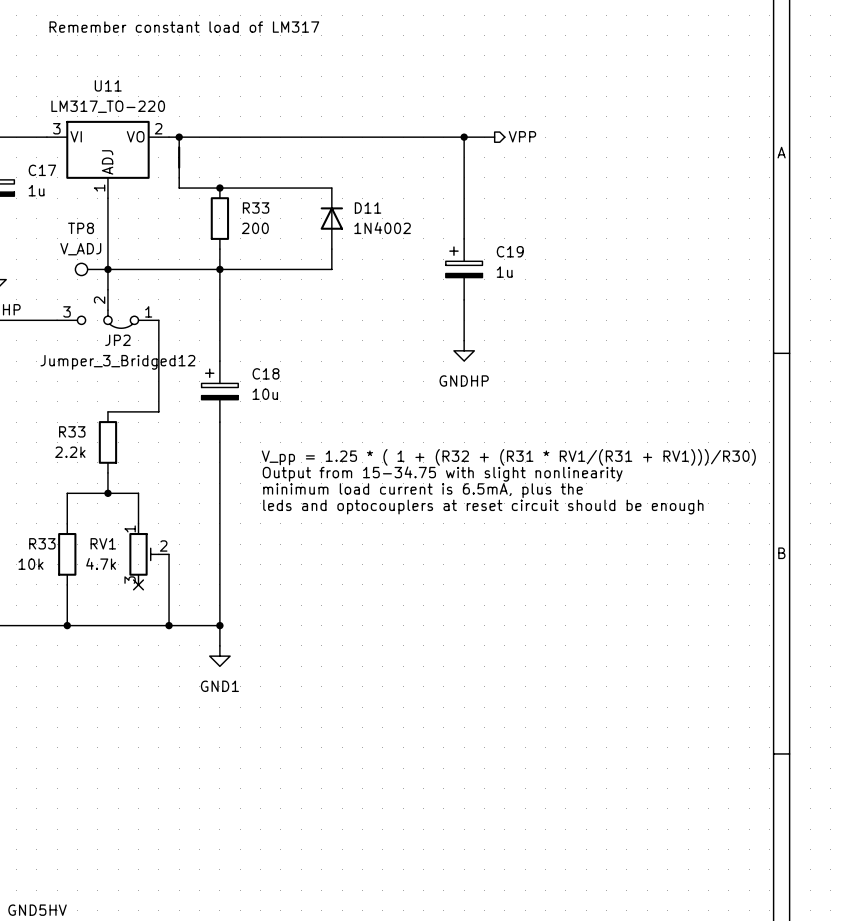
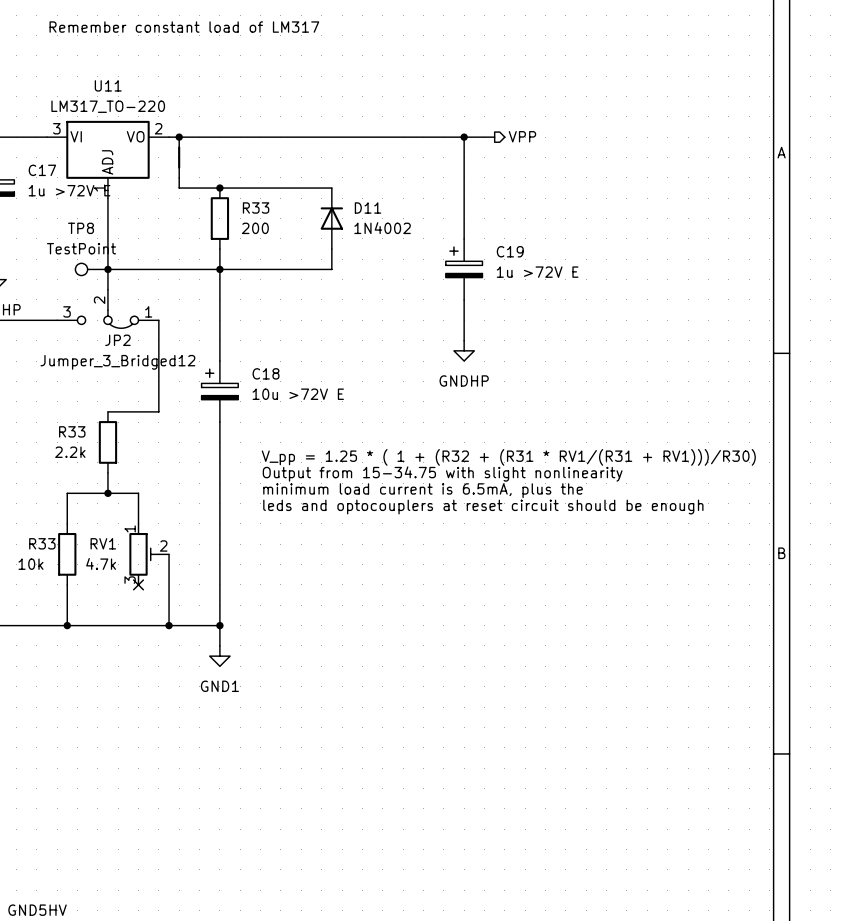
C17 value: 1u (36, 190) -> 1u >72V E (69, 190)
TP8 value: V_ADJ (80, 249) -> TestPoint (81, 248)
C19 value: 1u (504, 272) -> 1u >72V E (537, 272)
C18 value: 10u (265, 394) -> 10u >72V E (298, 394)

